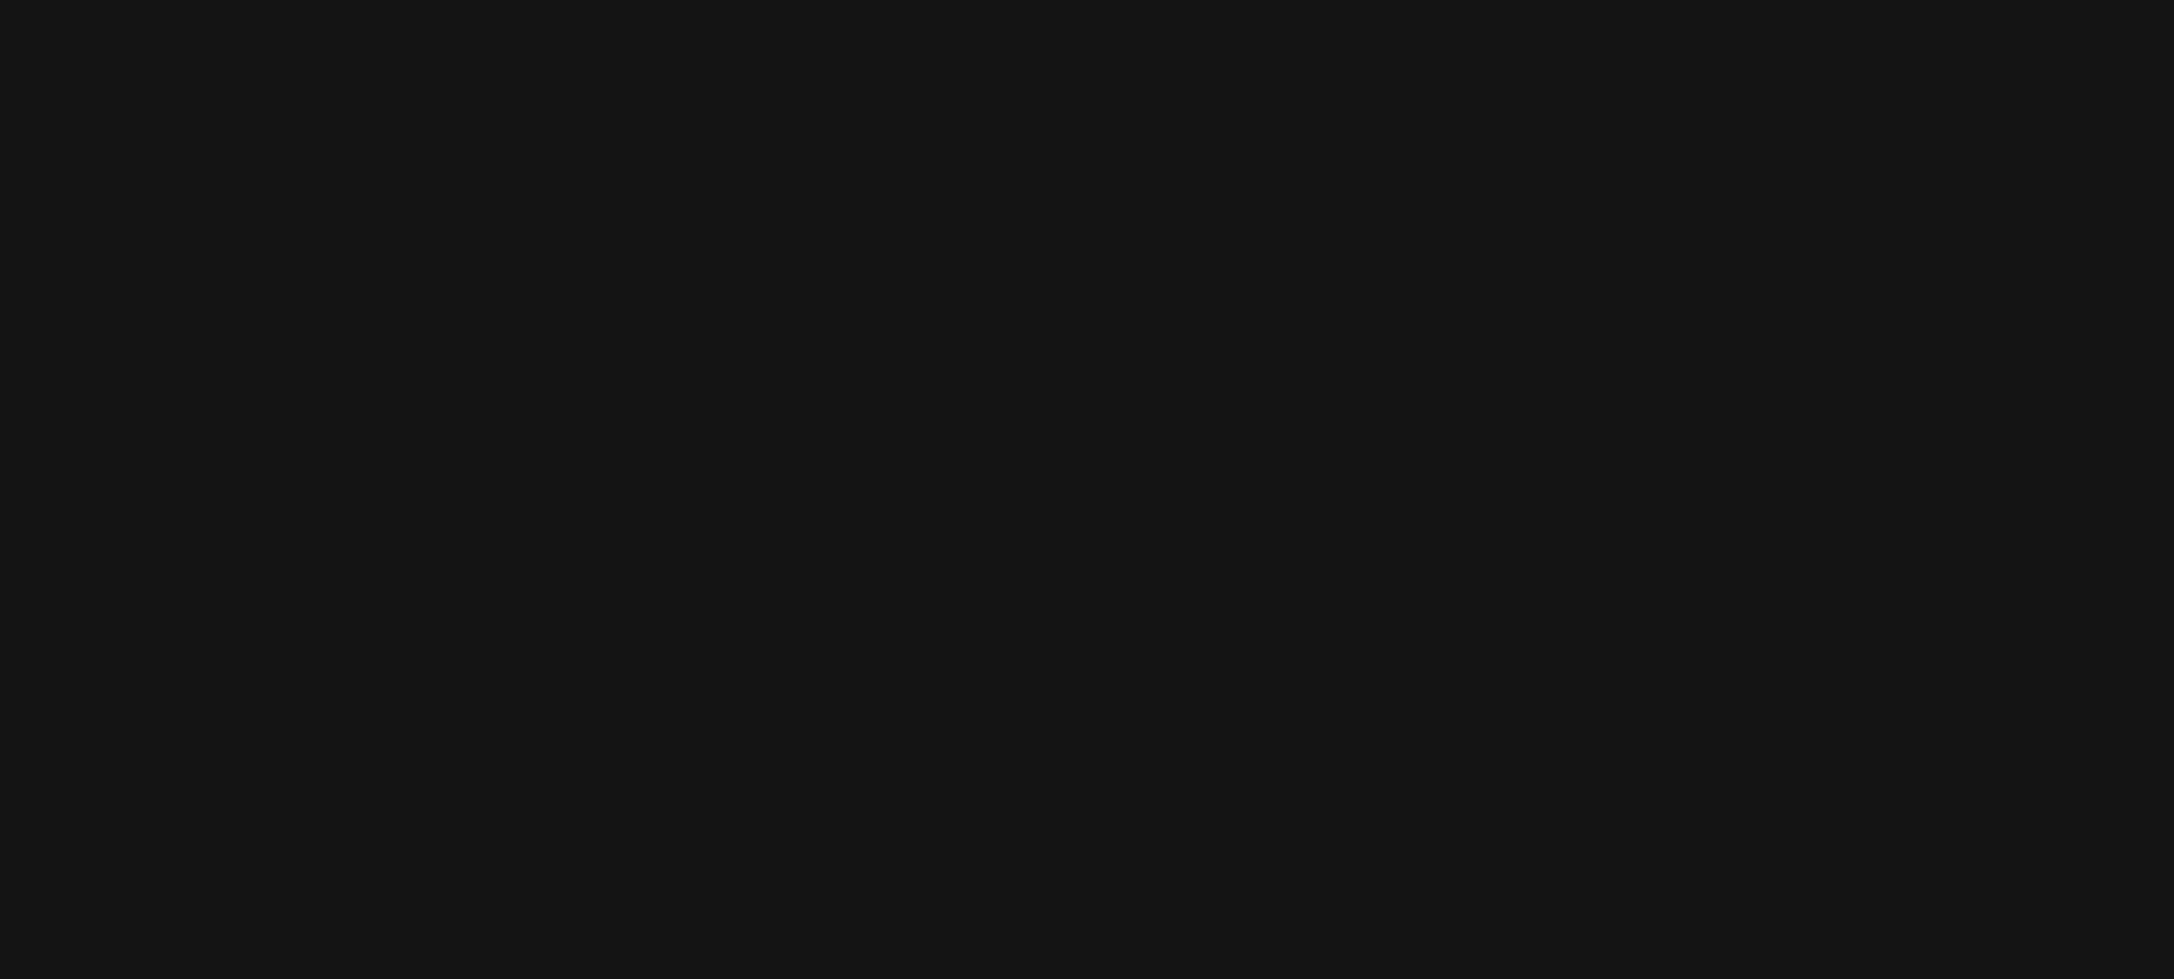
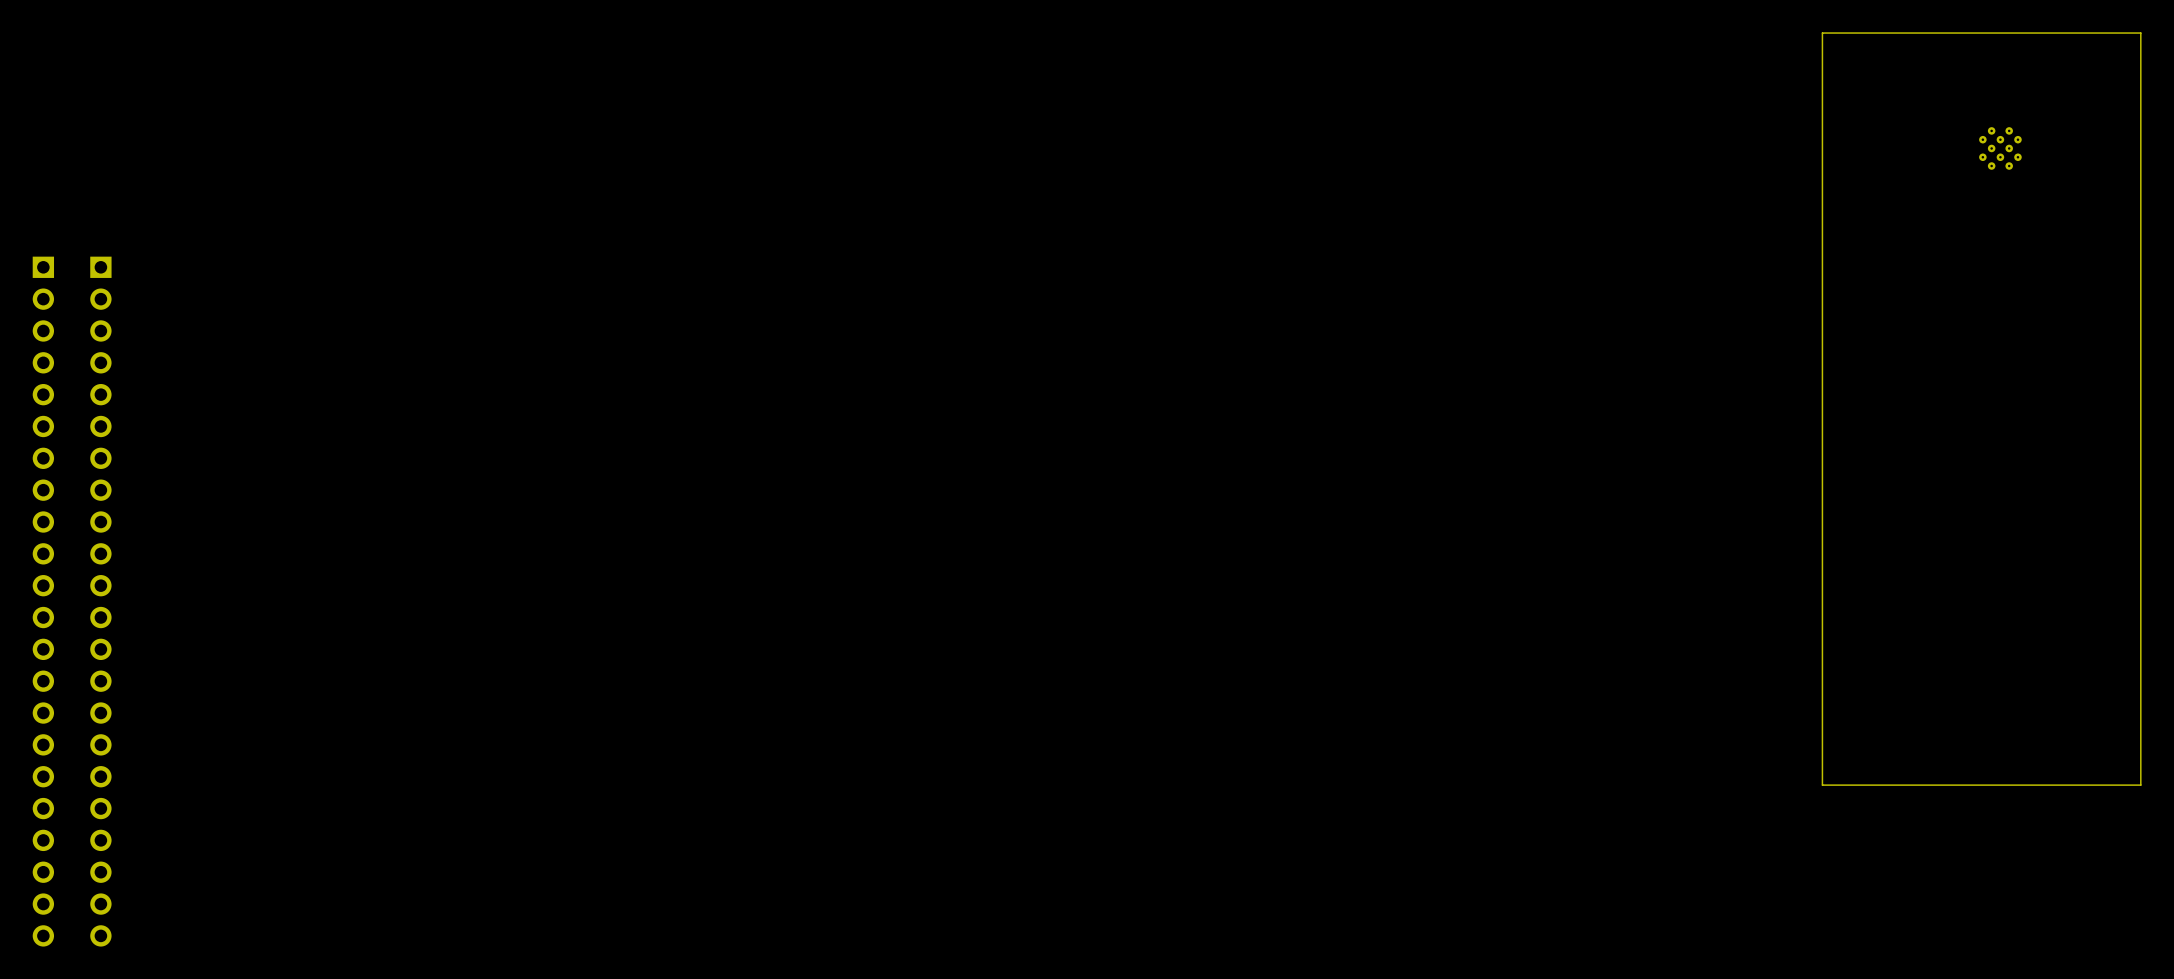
board edge: none -> (2140, 33) (1822, 33) (1822, 785) (2140, 785) (2140, 33)
part: none -> (2000, 148)
part: none -> (43, 601)
part: none -> (100, 601)

